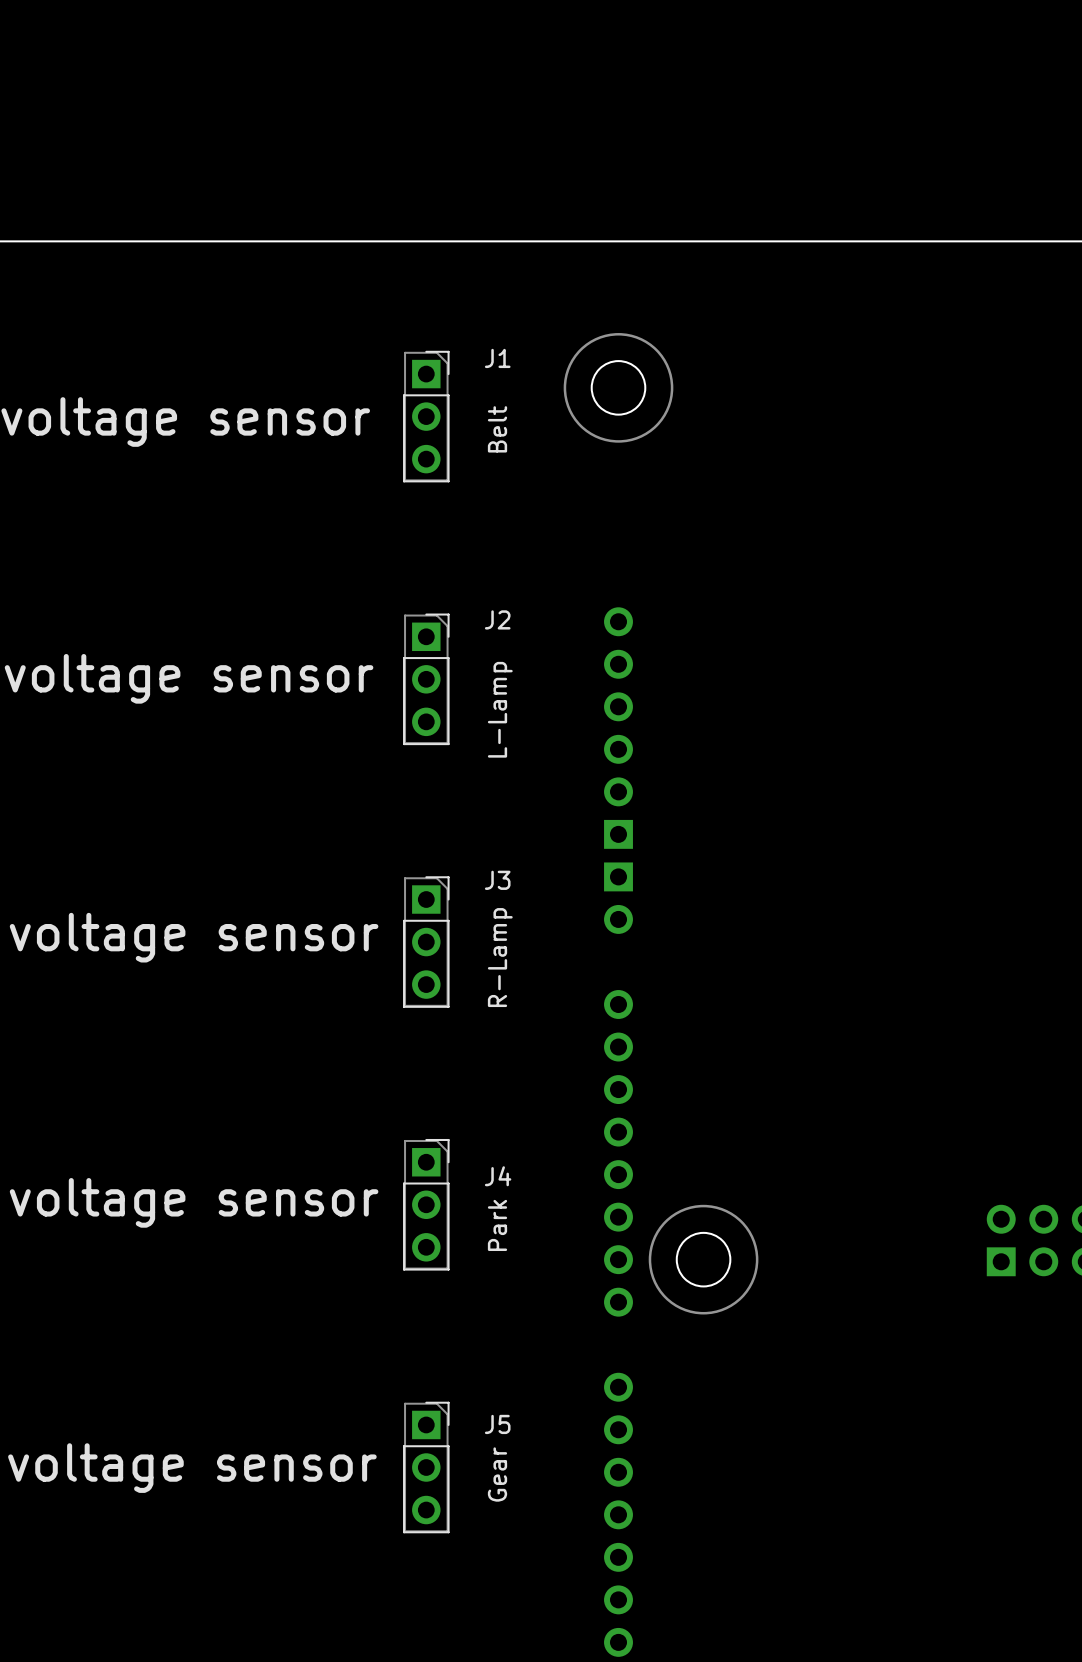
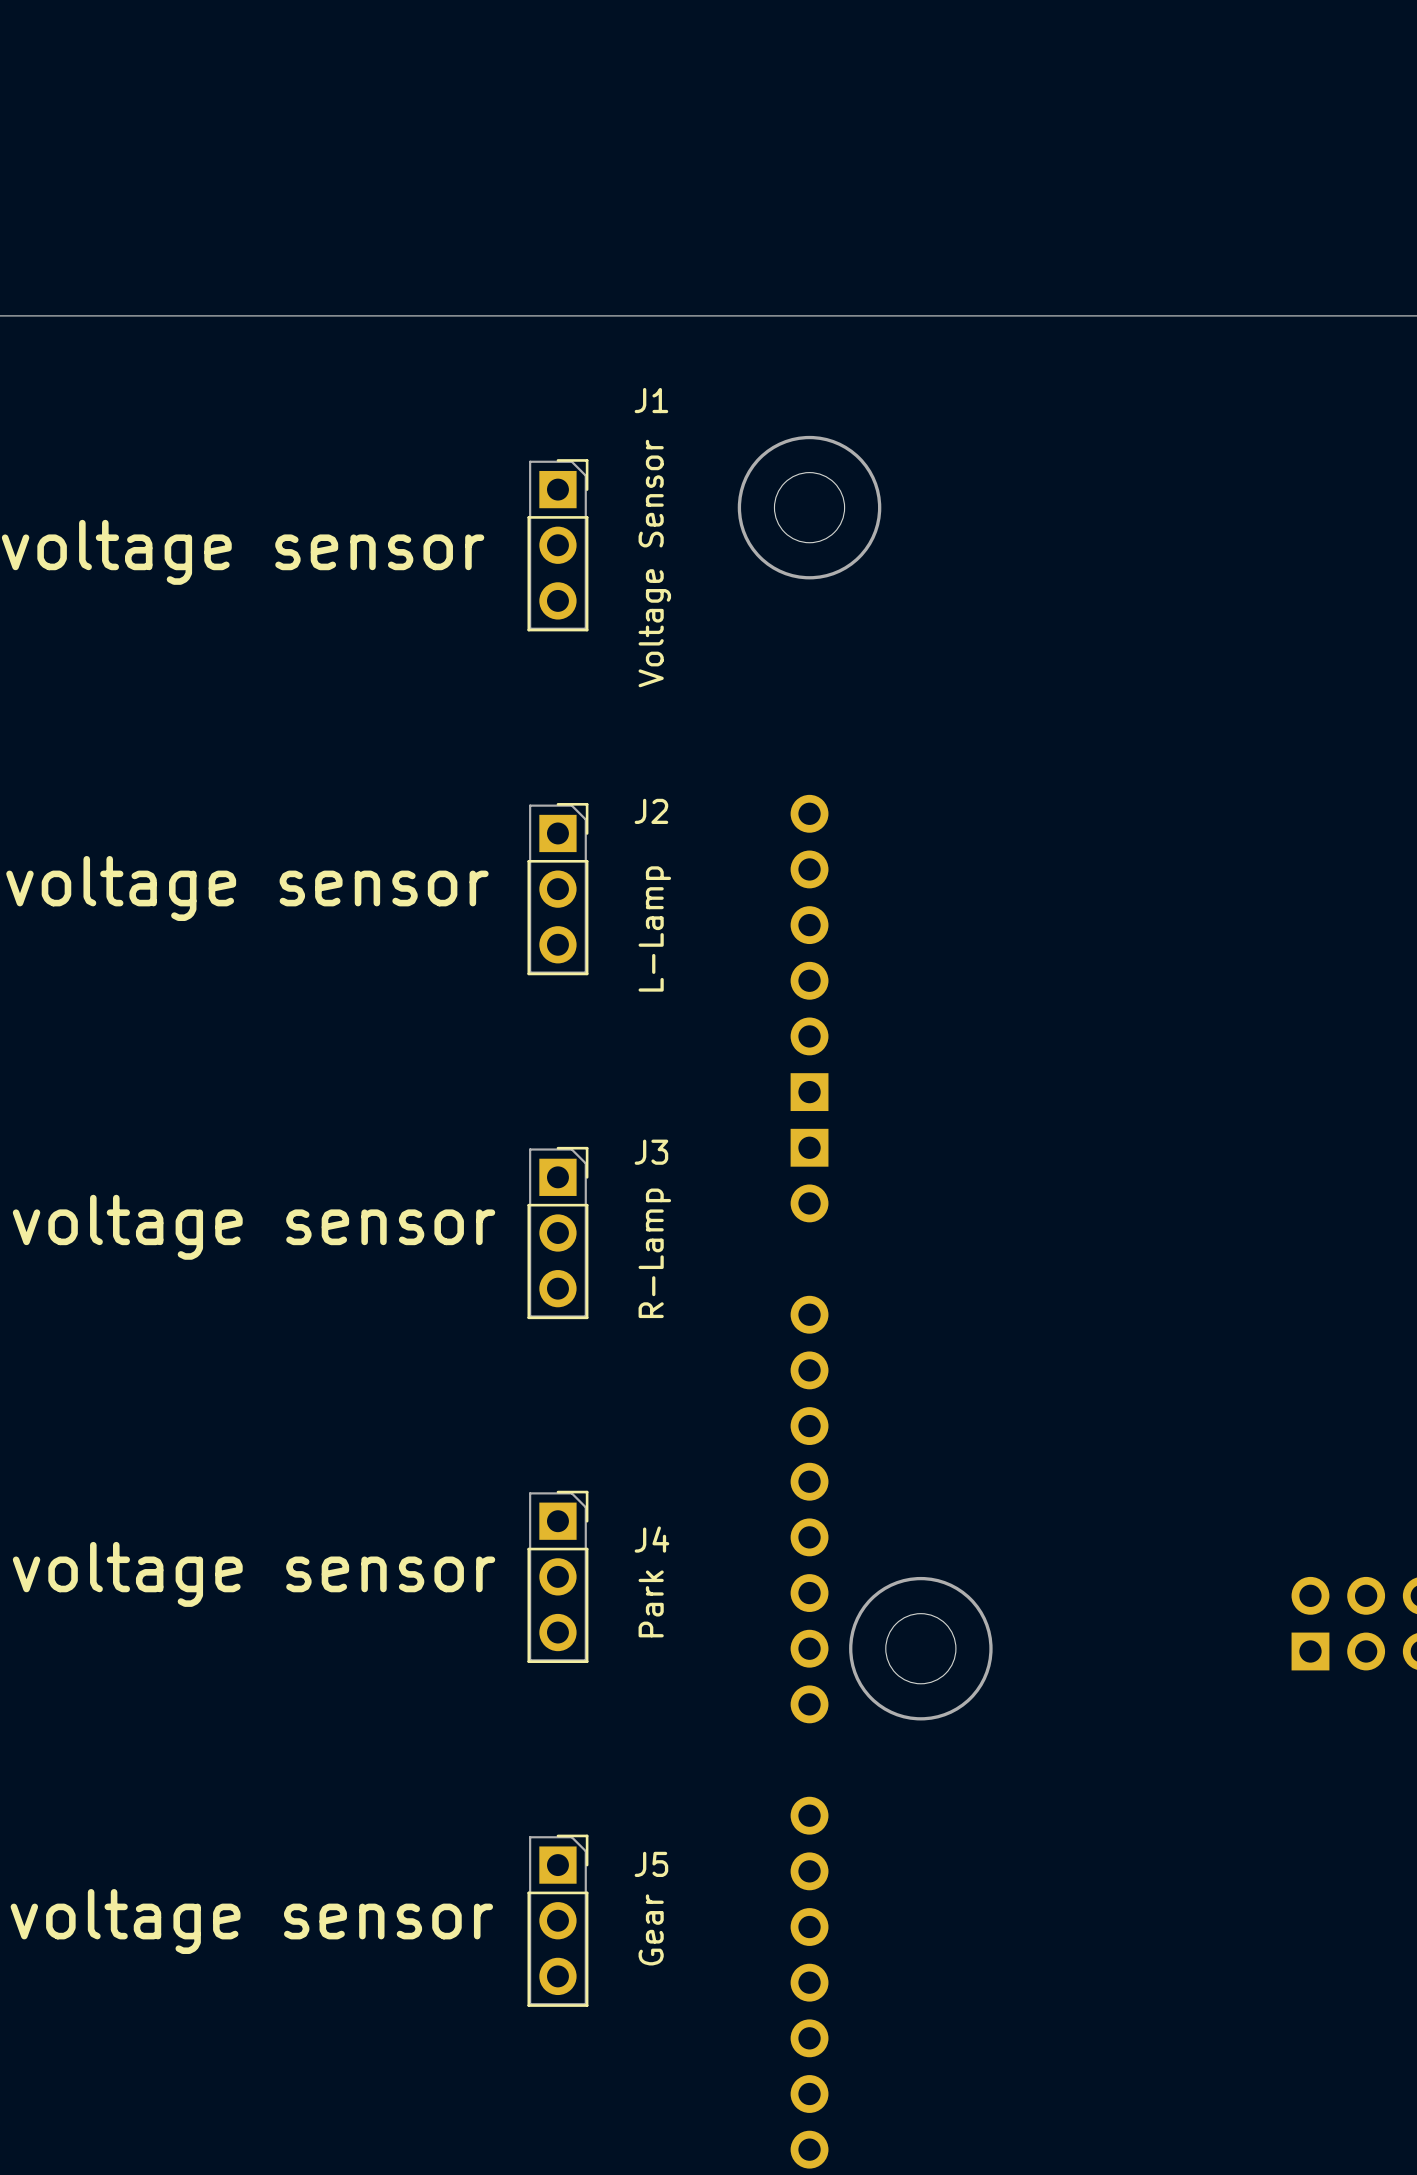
J1 name position: J1 (497, 358) -> J1 (651, 400)
J1 text: Belt (497, 429) -> Voltage Sensor (654, 563)

